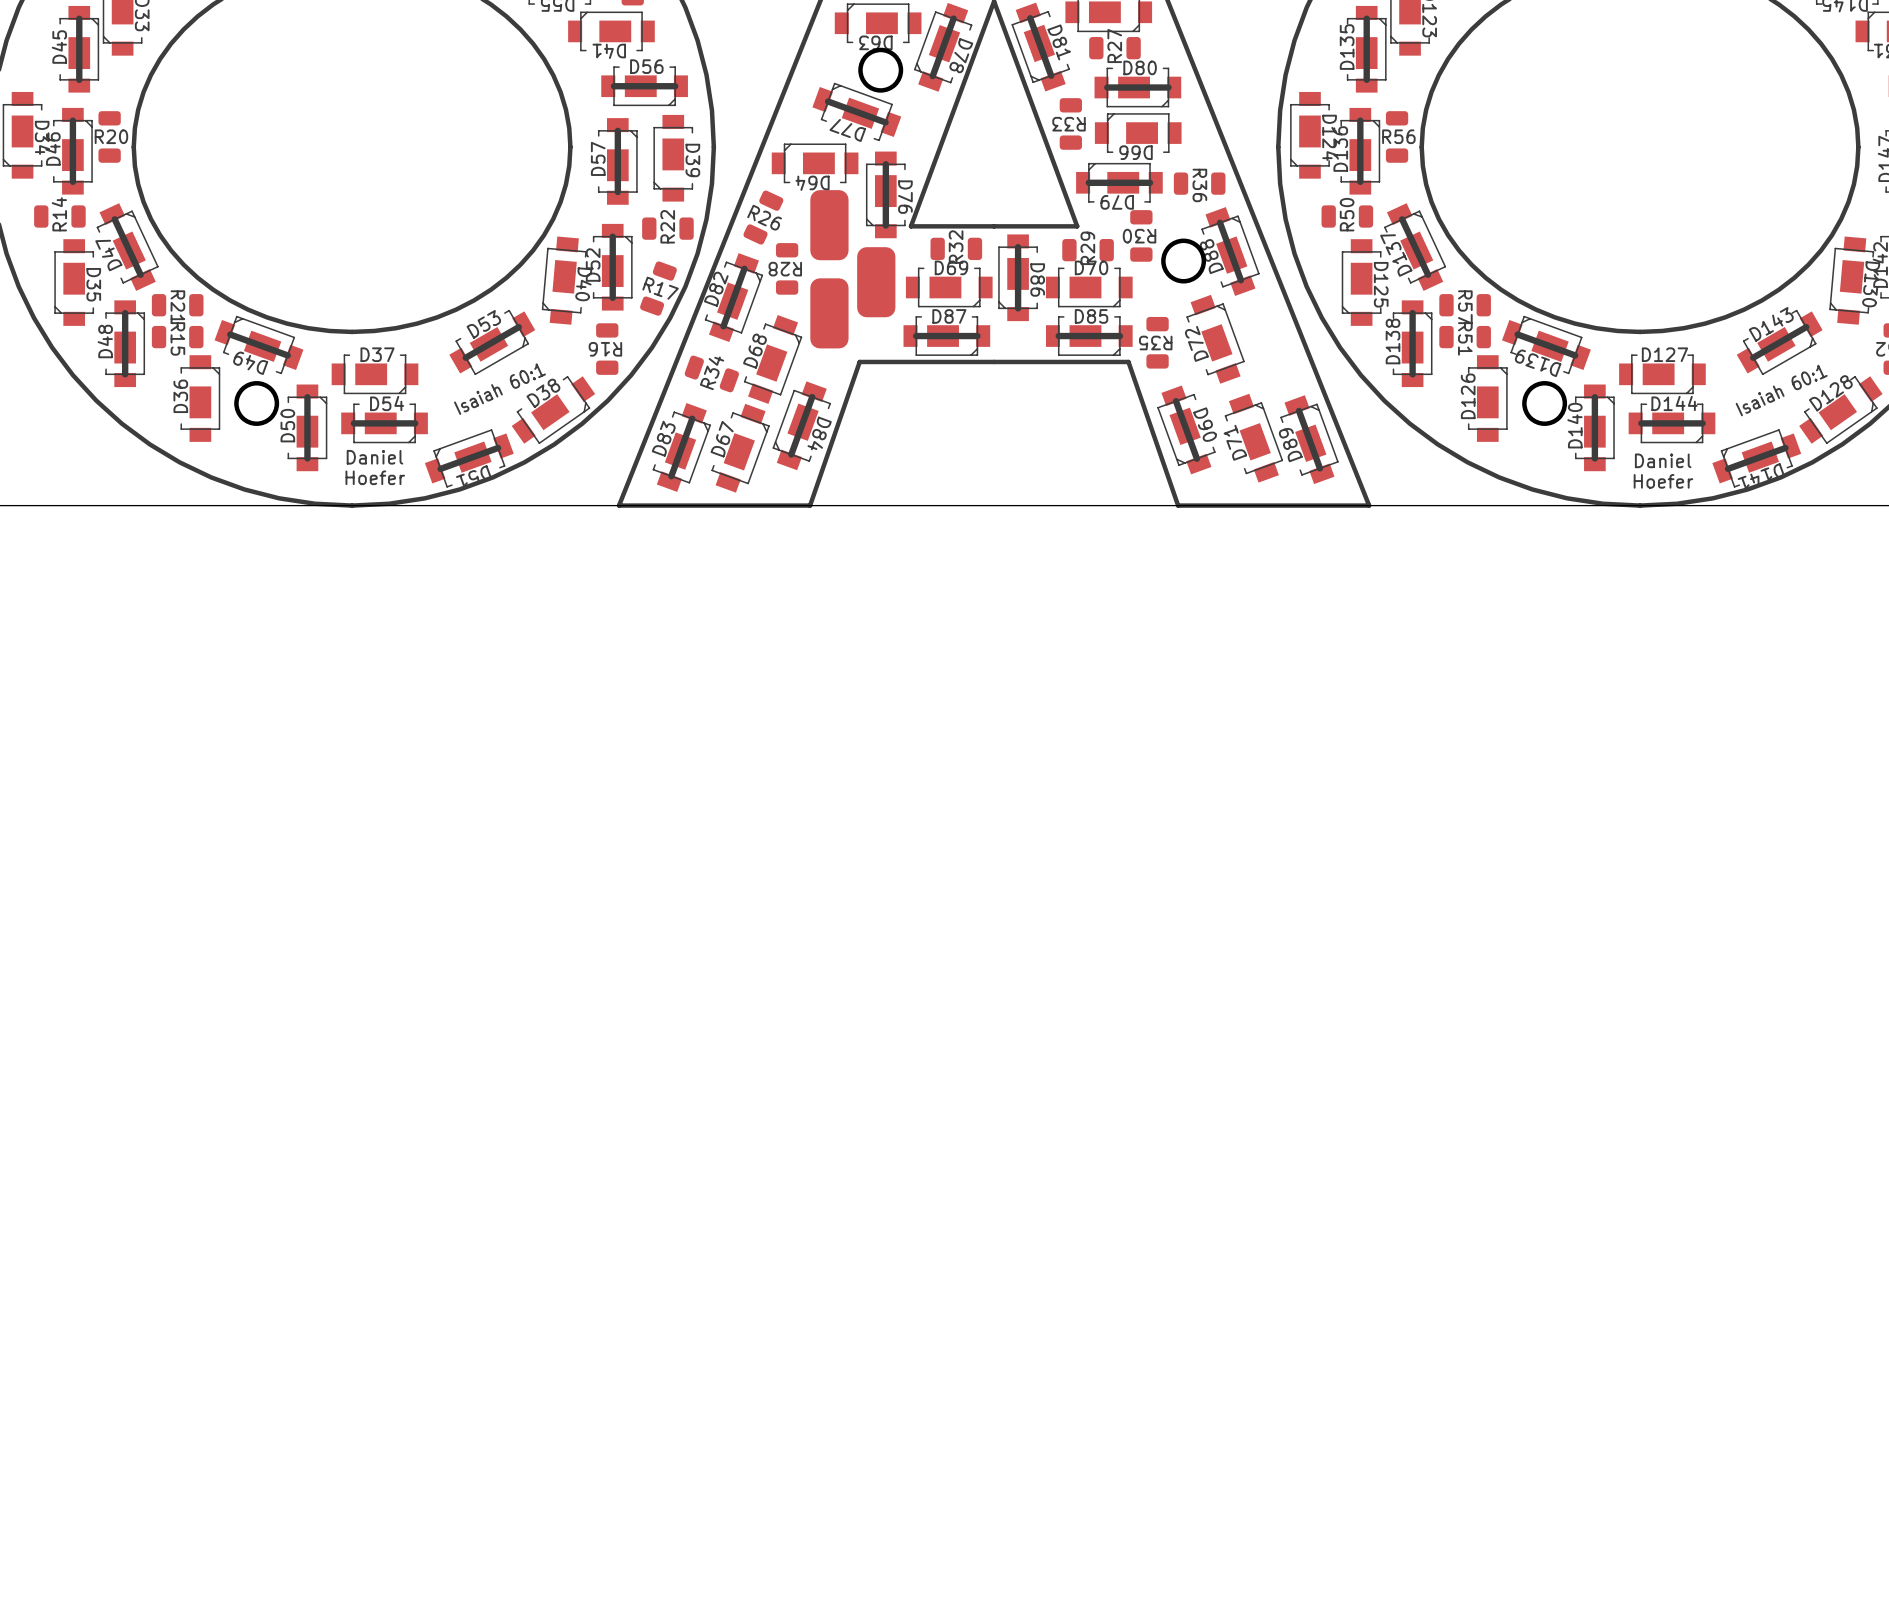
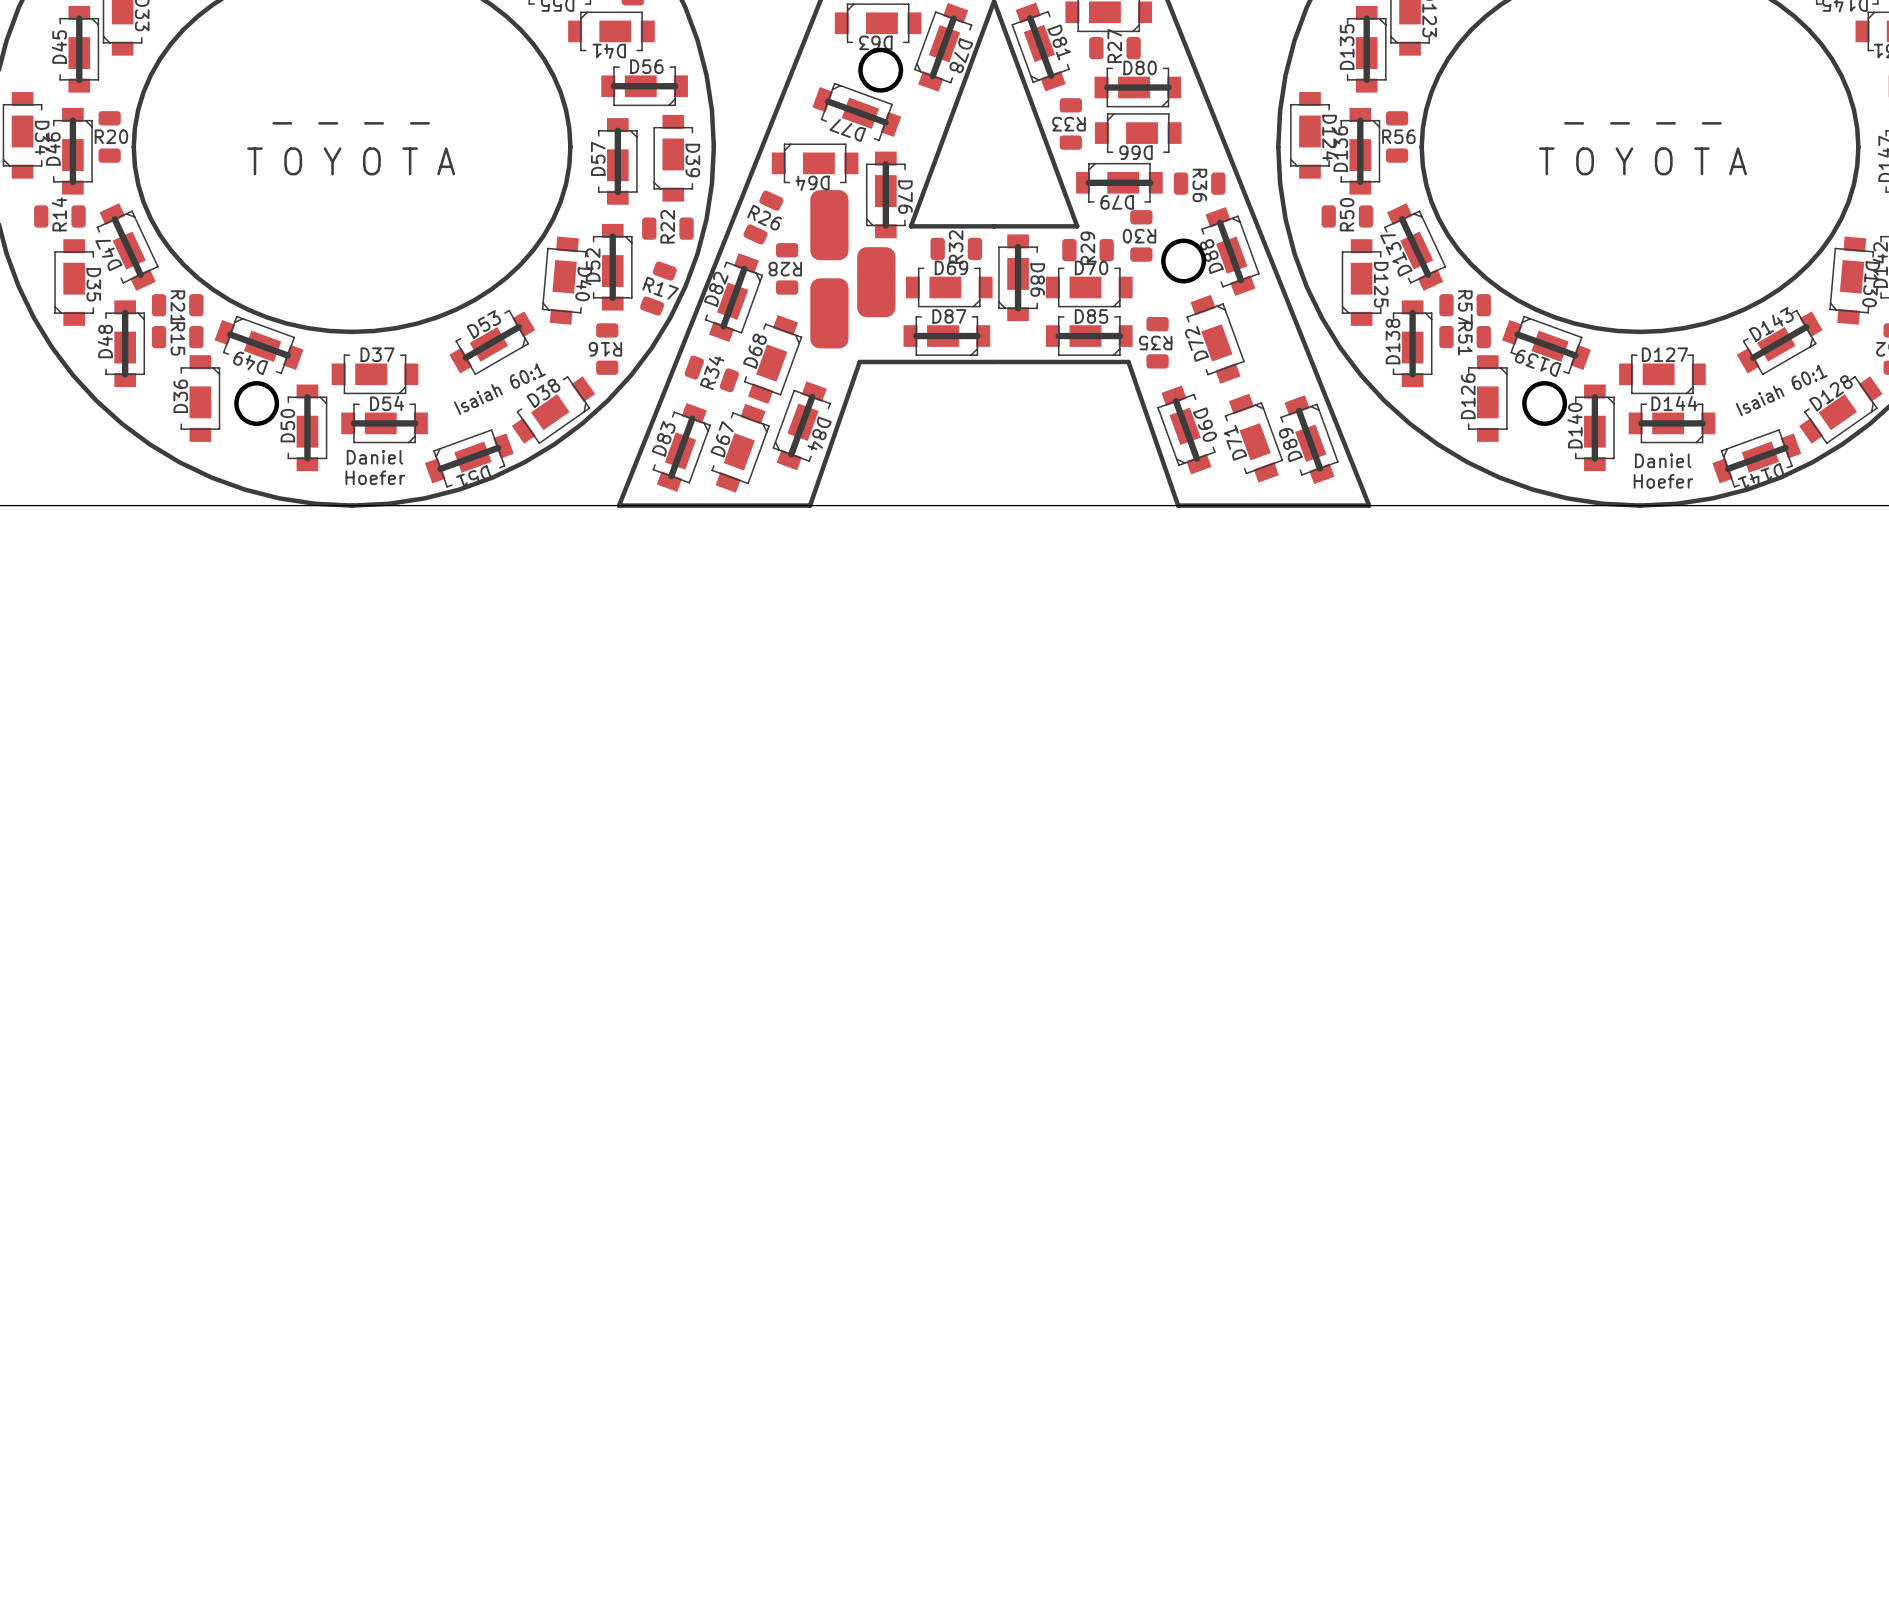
text: none -> - - - - (351, 123)
text: none -> - - - - (1642, 123)
text: none -> T O Y O T A (351, 161)
text: none -> T O Y O T A (1642, 161)

